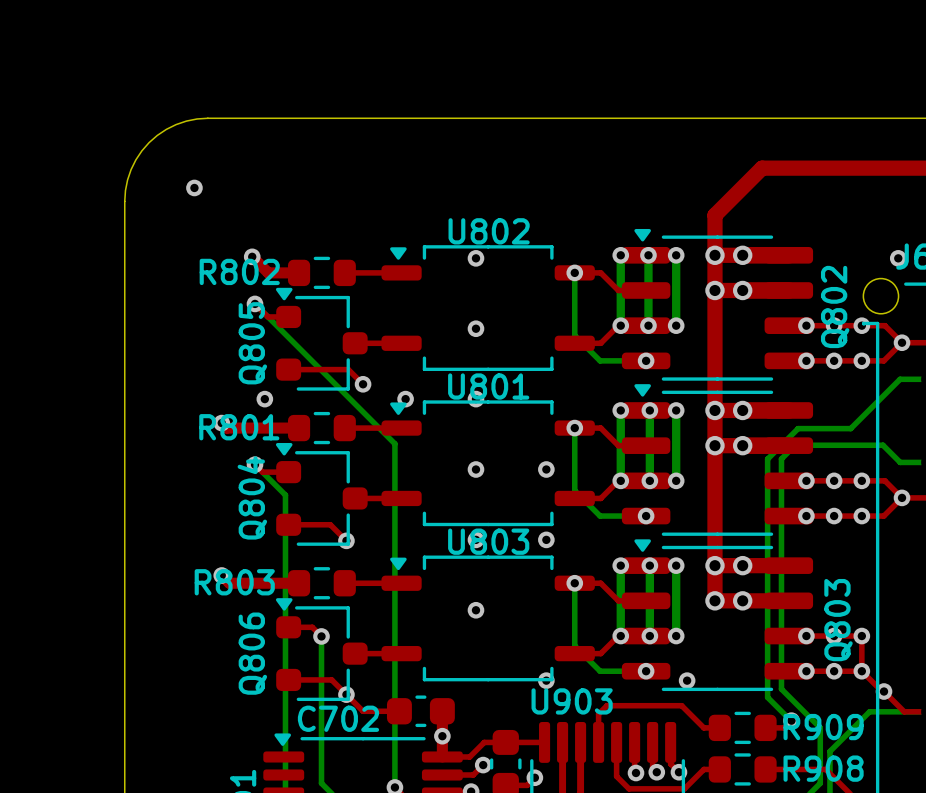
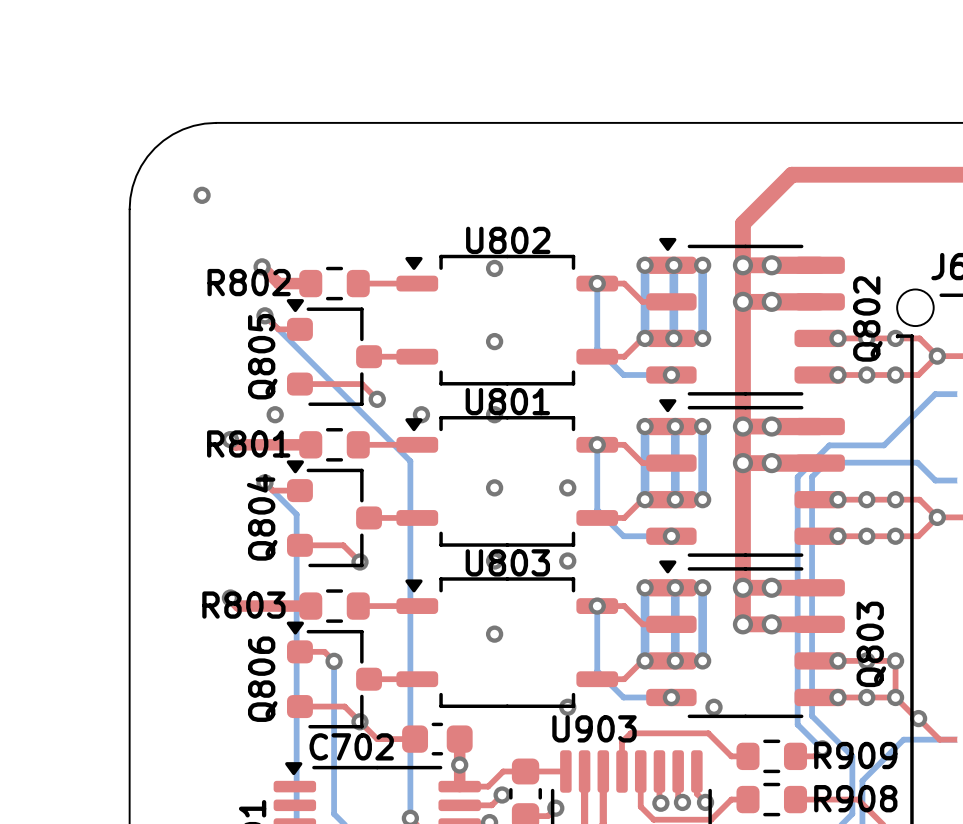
via: (898, 258) -> none

